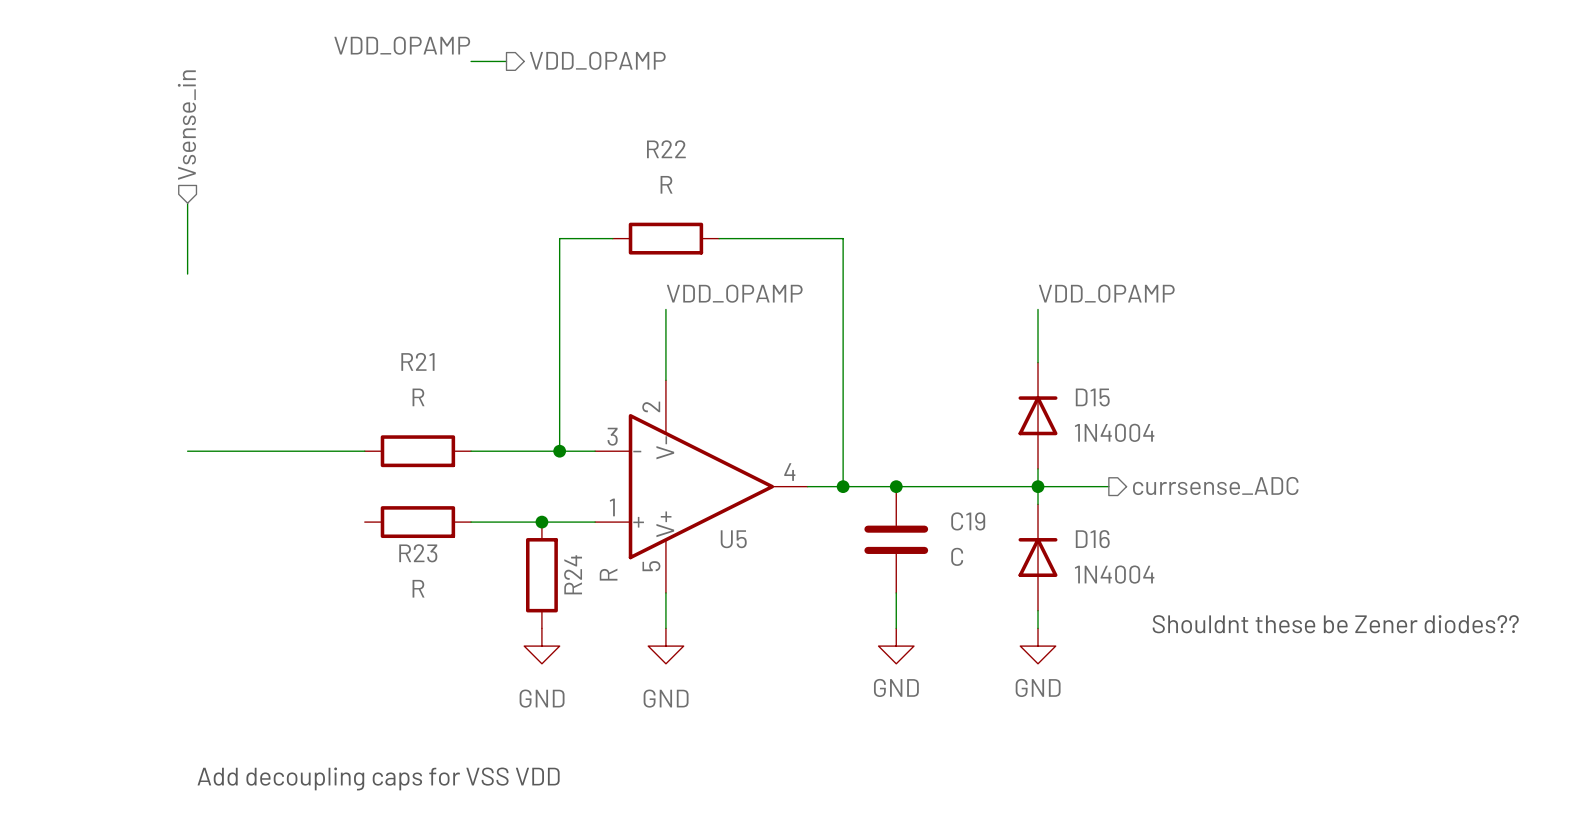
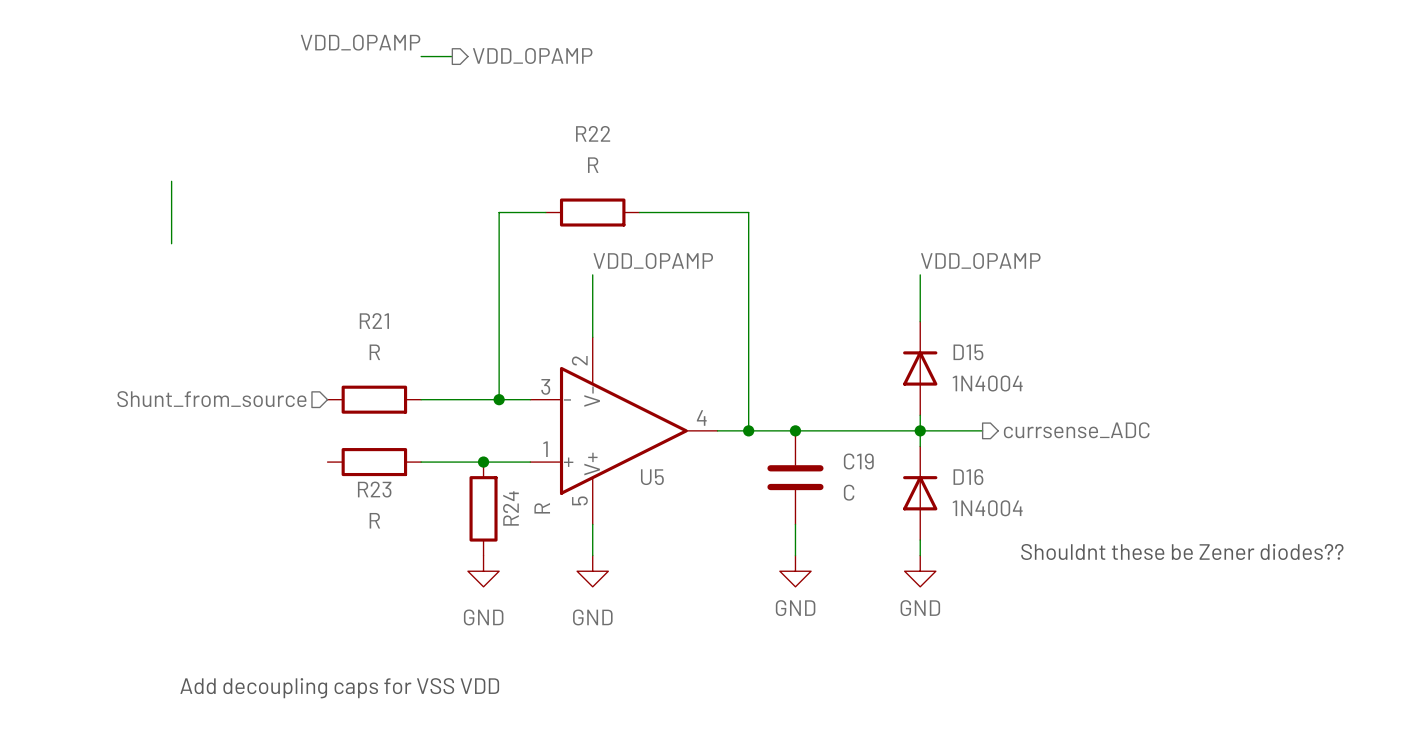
hierarchical label: Vsense_in (186, 125) -> none
hierarchical label: none -> Shunt_from_source (211, 399)
wire: (187, 451) (364, 451) -> none

